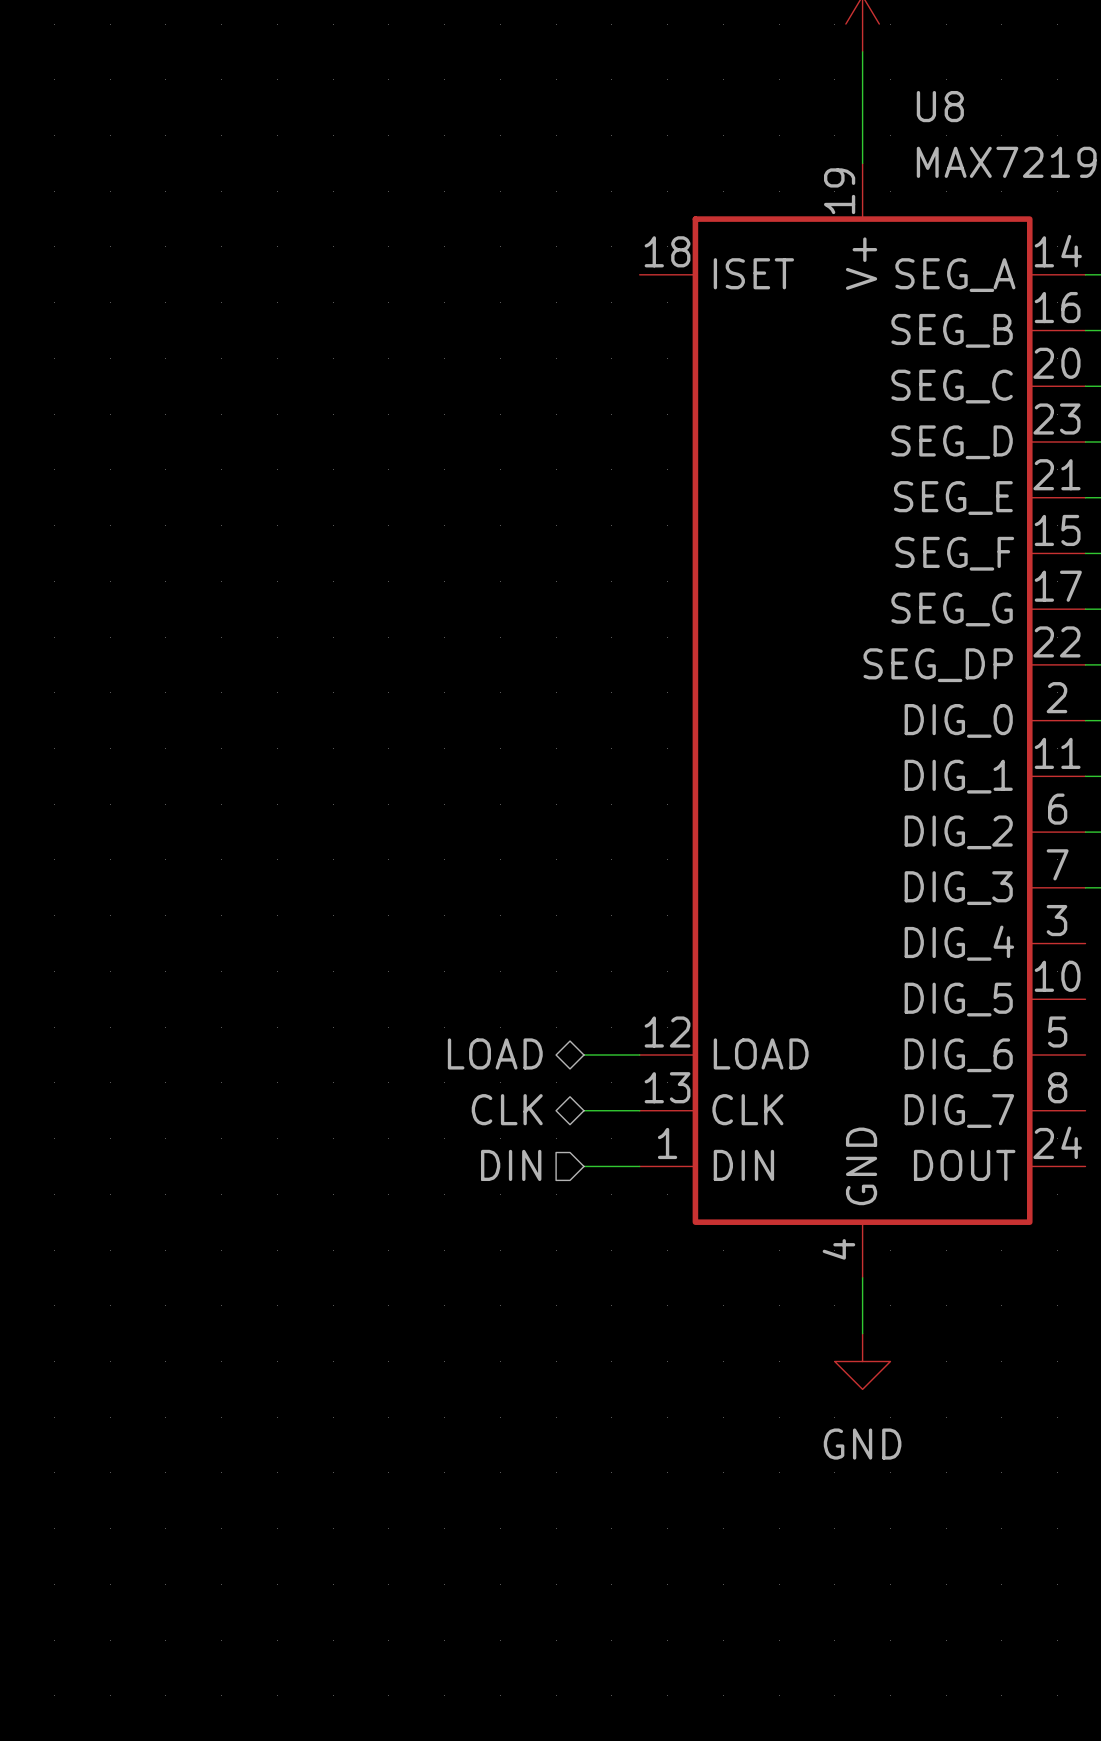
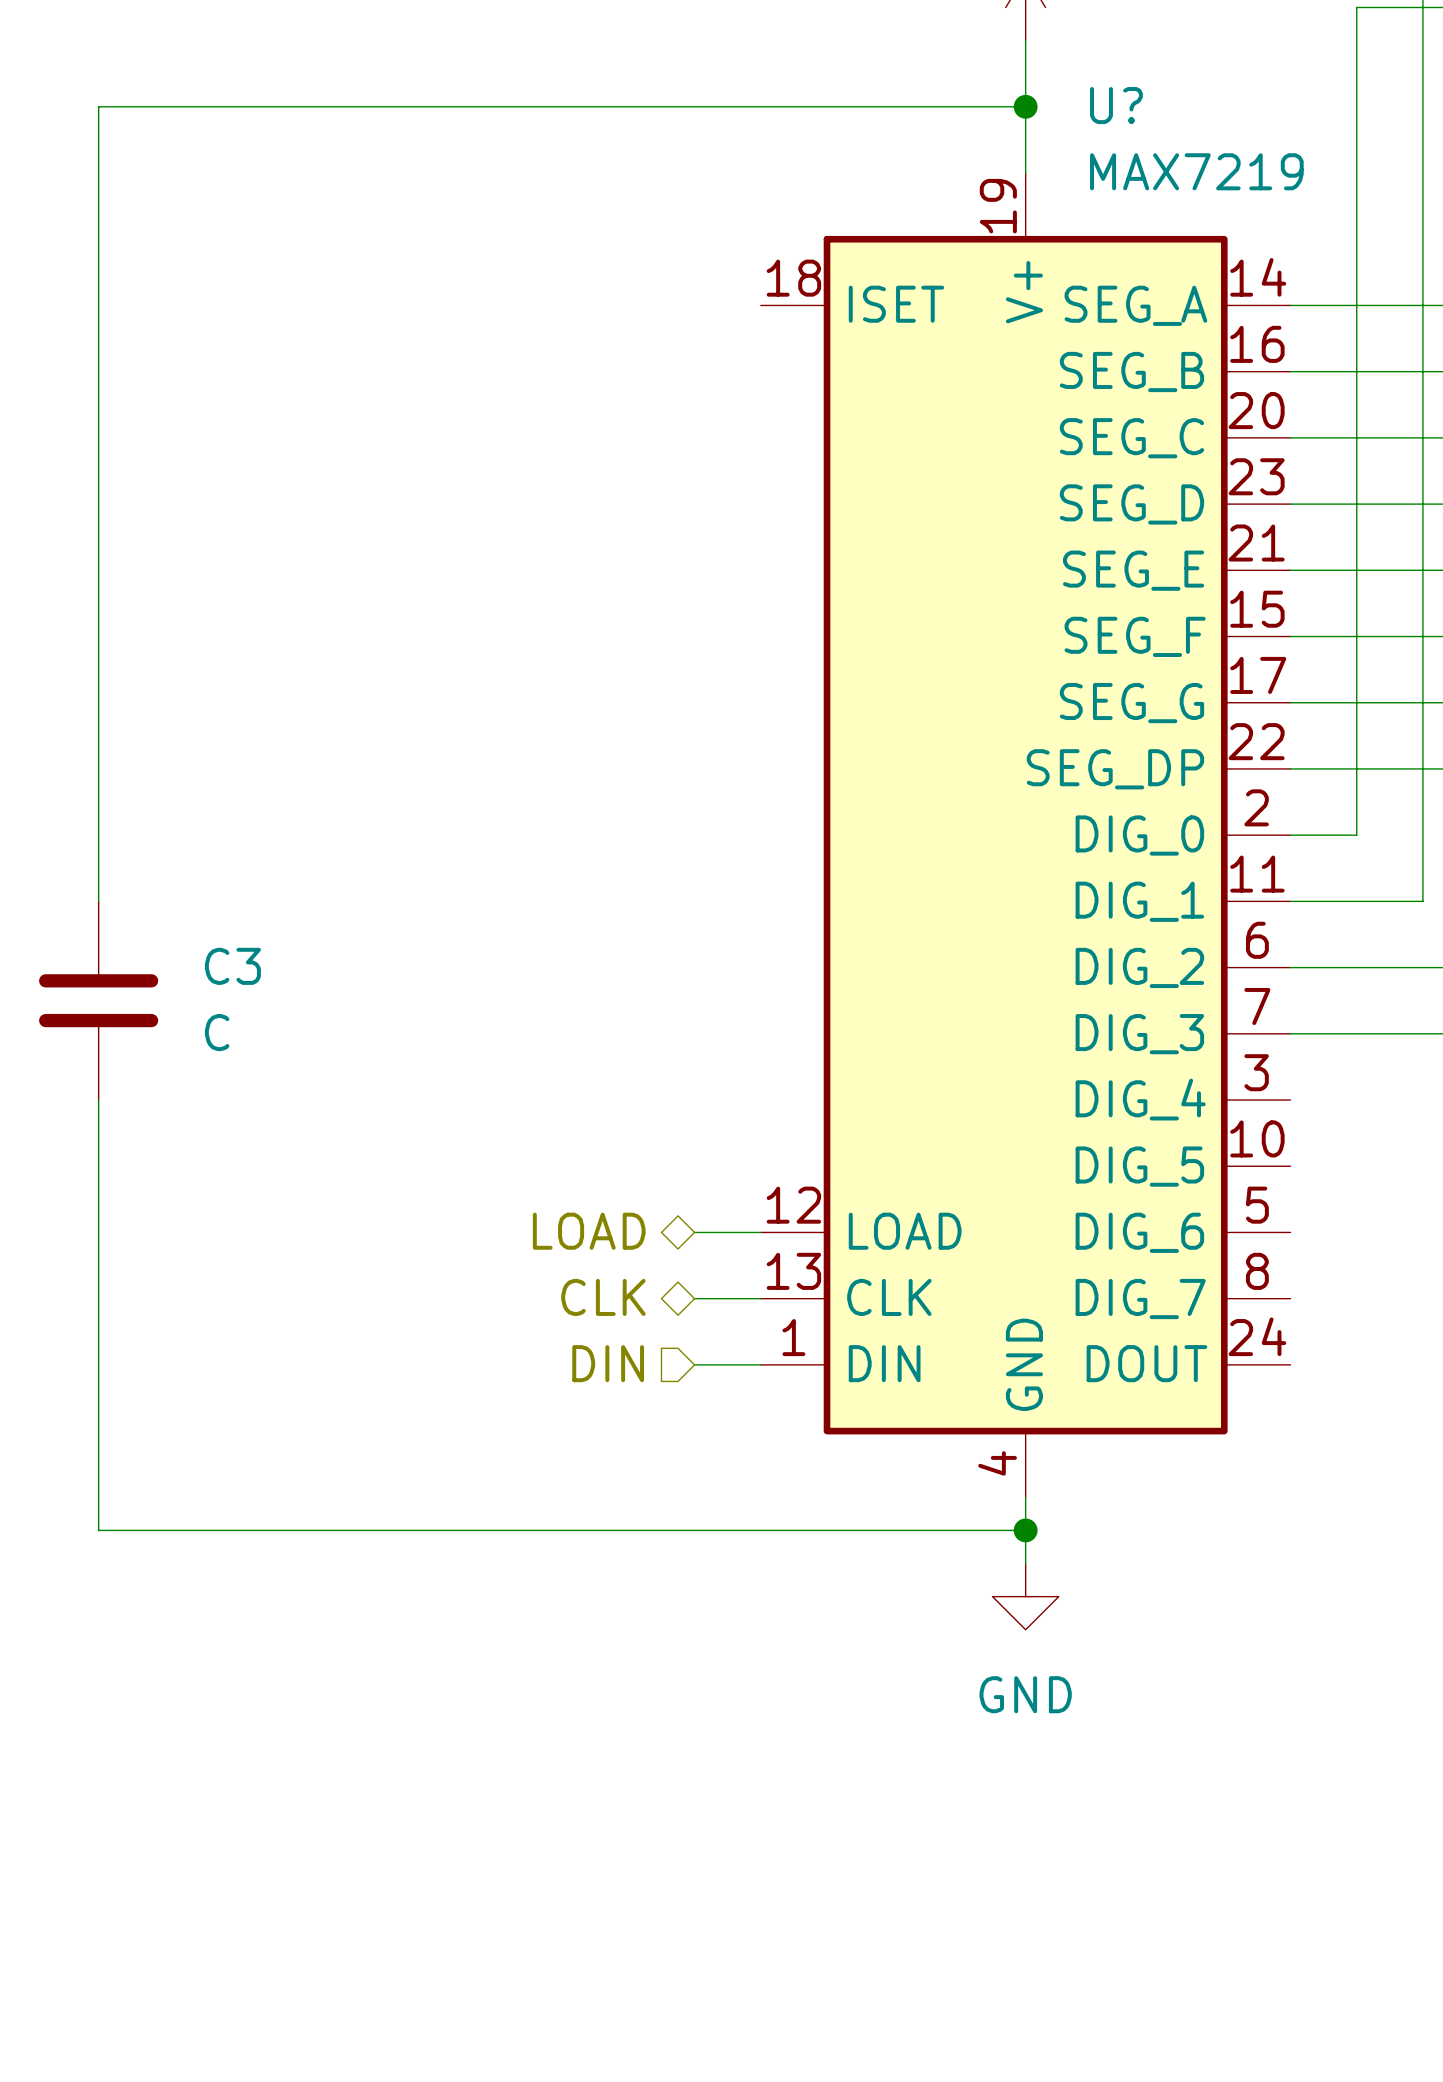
U8 name: U8 (940, 106) -> U? (1116, 105)
wire: none -> (1025, 106) (98, 106) (98, 901)
junction: none -> (1025, 106)
C3: none -> C (98, 1000)
wire: none -> (98, 1100) (98, 1530) (1025, 1530)
junction: none -> (1025, 1530)

